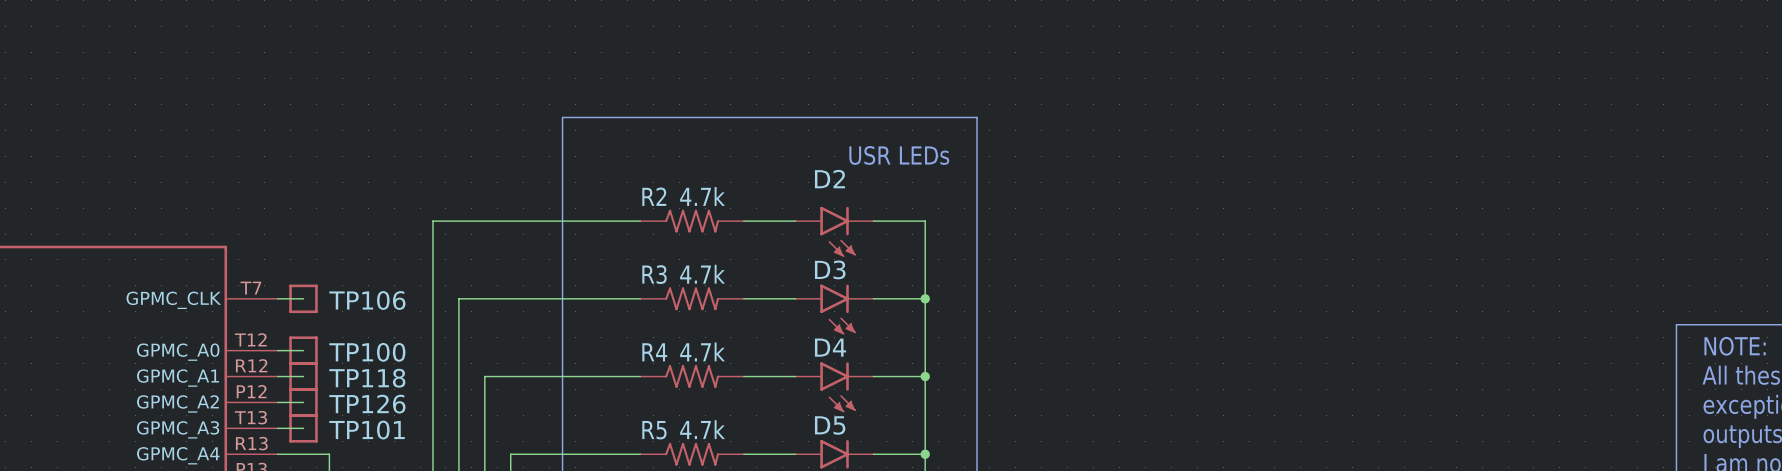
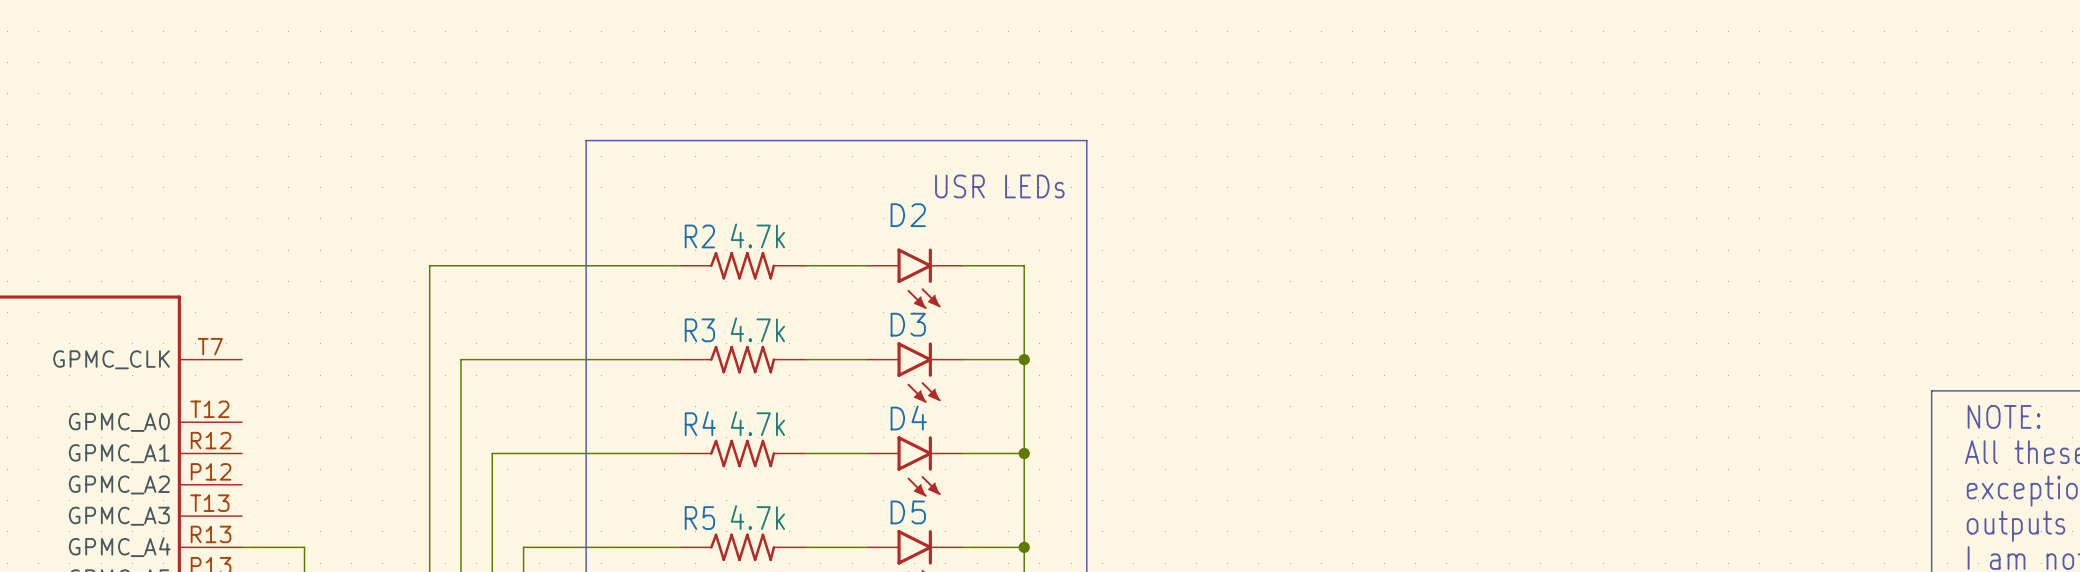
wire: (277, 298) (303, 298) -> none
TP106: (303, 298) -> none
wire: (277, 350) (303, 350) -> none
TP100: (303, 350) -> none
wire: (277, 376) (303, 376) -> none
TP118: (303, 376) -> none
wire: (277, 402) (303, 402) -> none
TP126: (303, 402) -> none
wire: (277, 428) (303, 428) -> none
TP101: (303, 428) -> none

